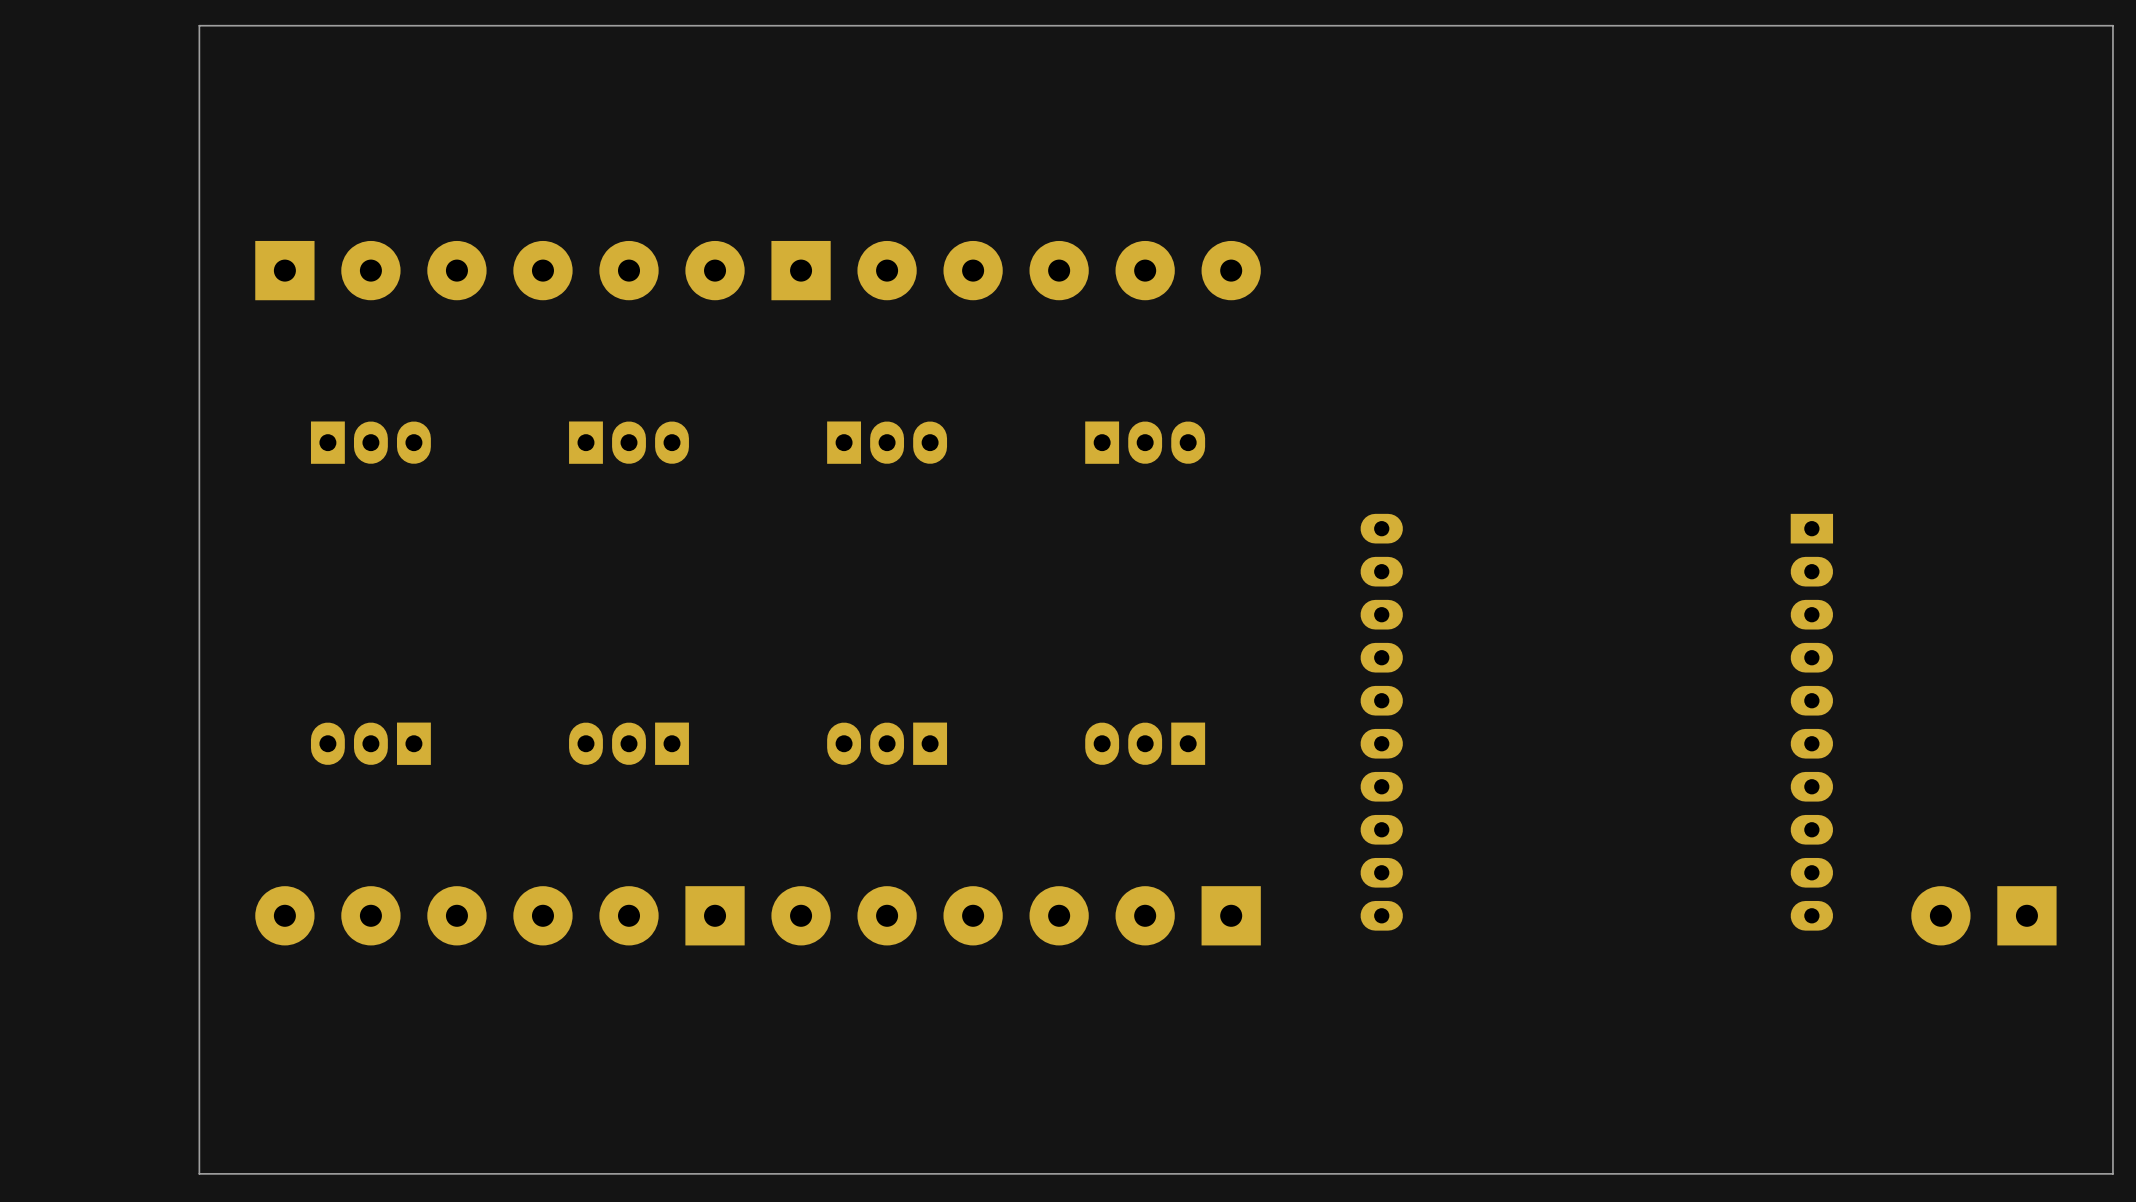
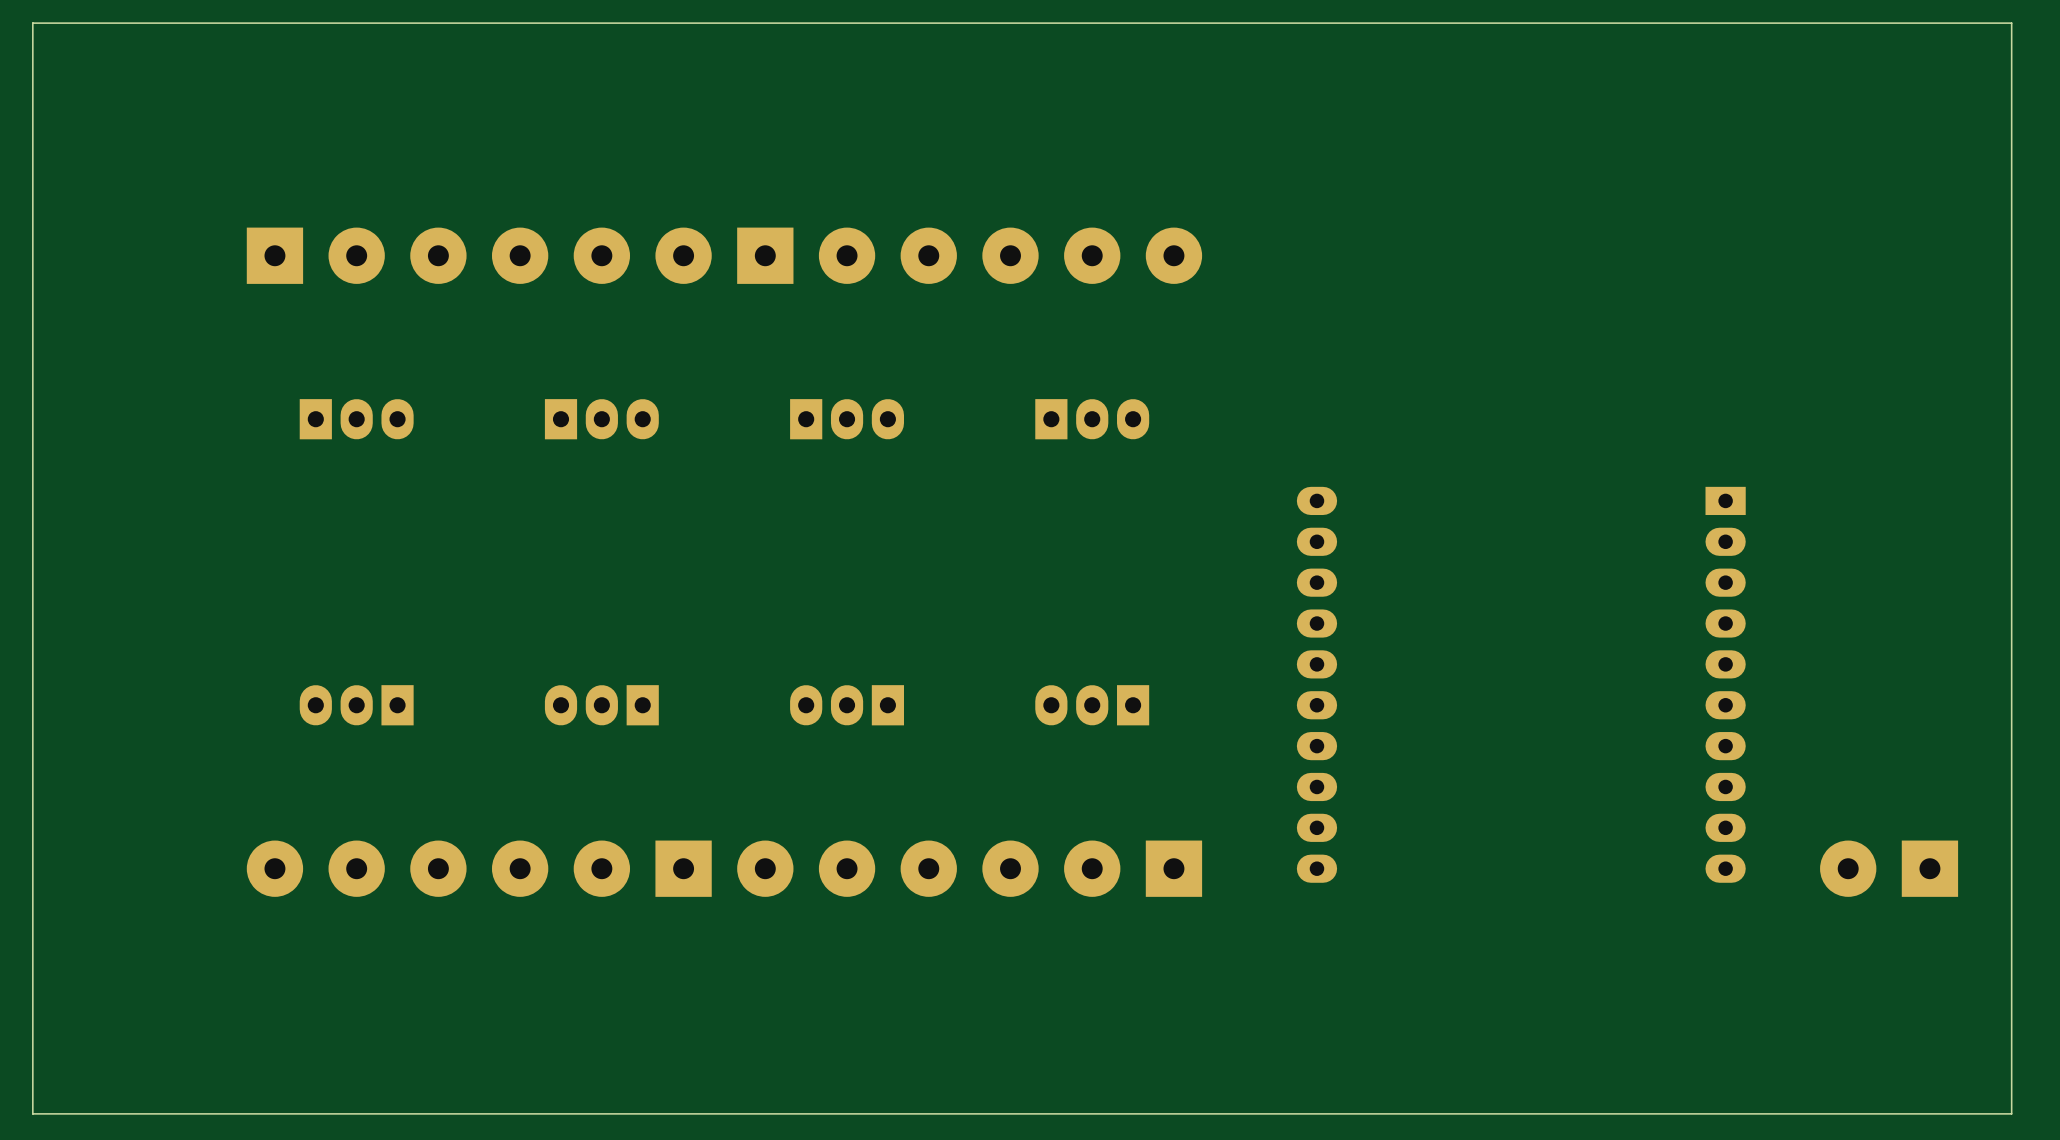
board edge: (199, 25) (199, 1173) -> (193, 23) (32, 23) (32, 1113) (193, 1113)

